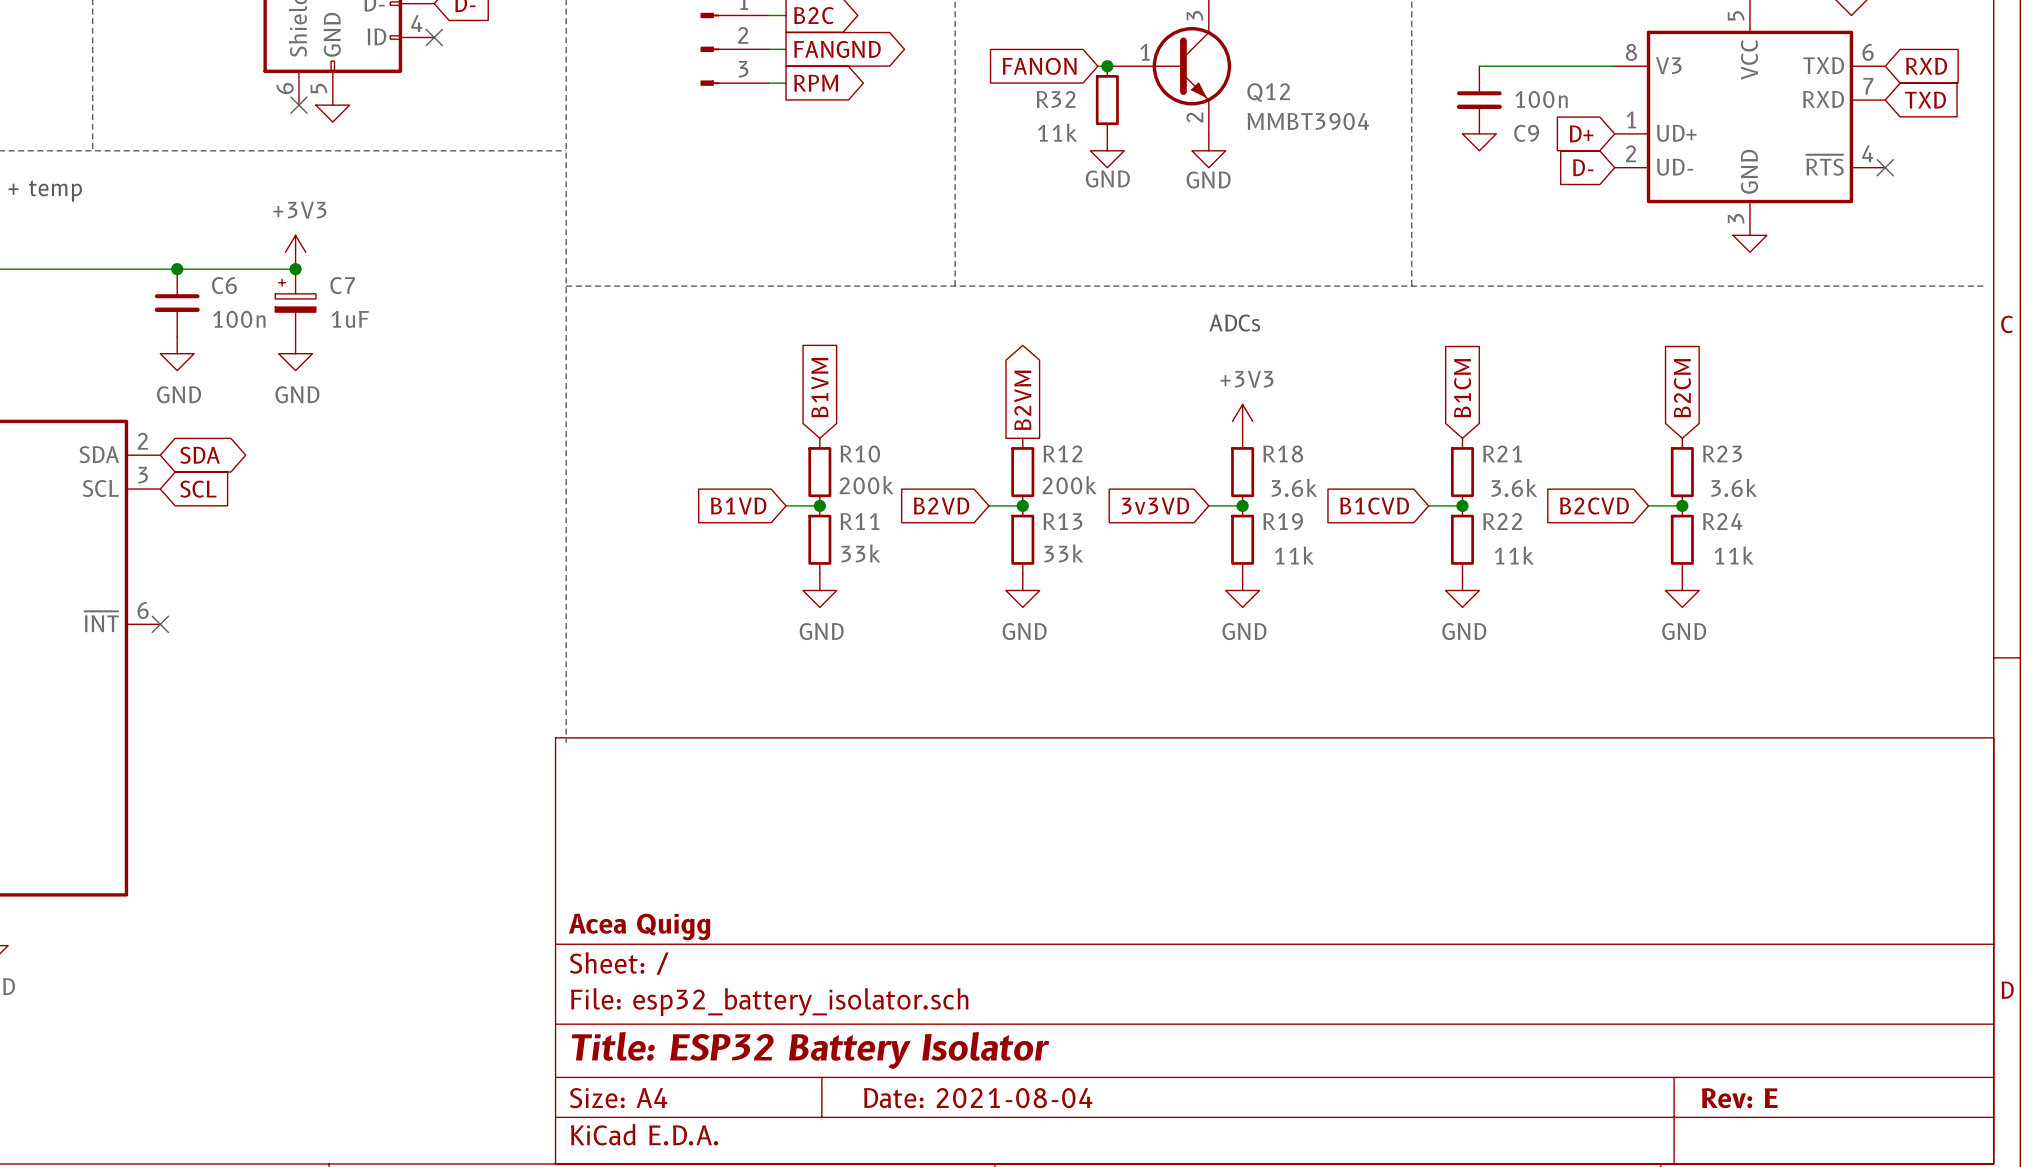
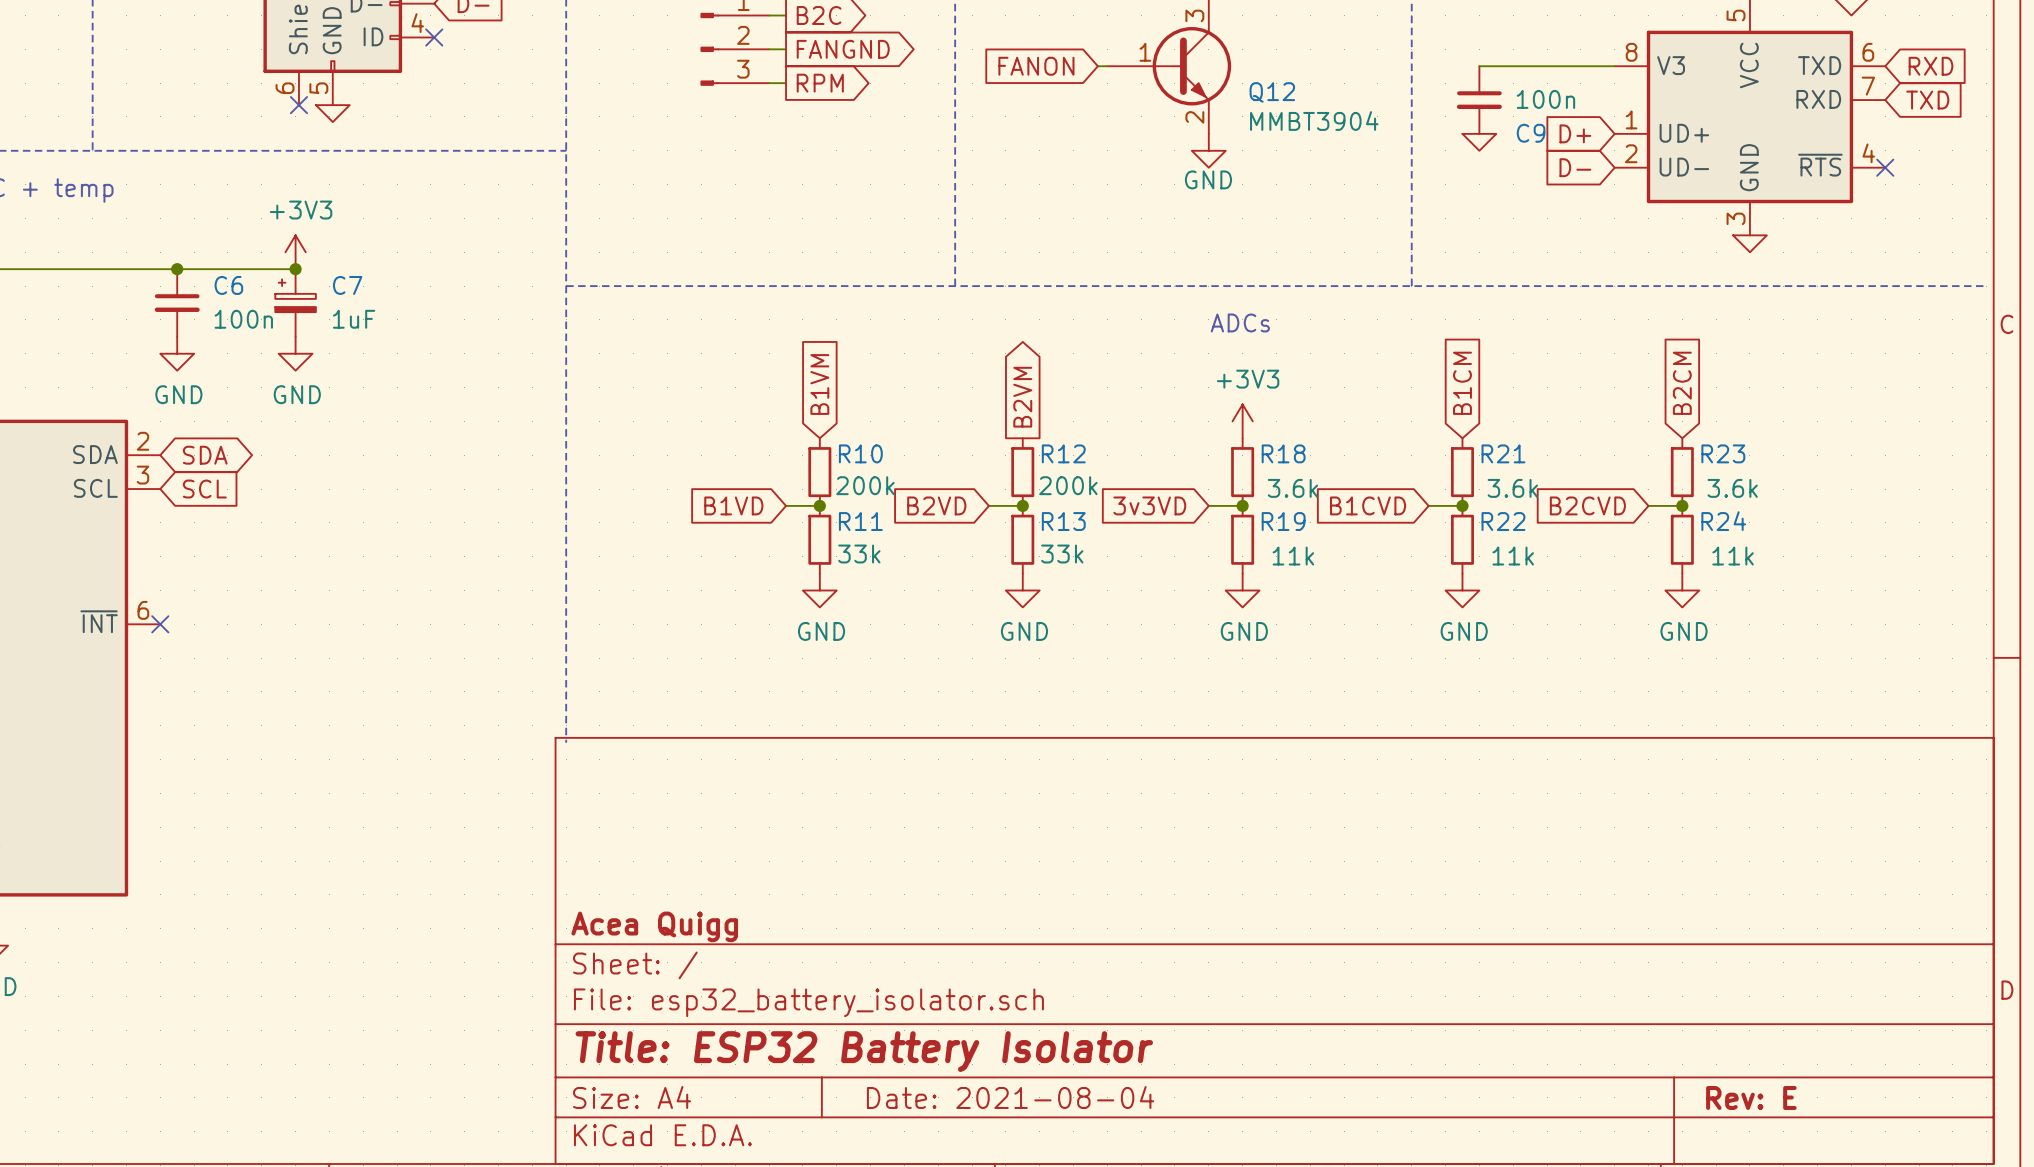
junction: (1107, 66) -> none
R32: 11k (1107, 100) -> none
power symbol: GND (1107, 150) -> none

